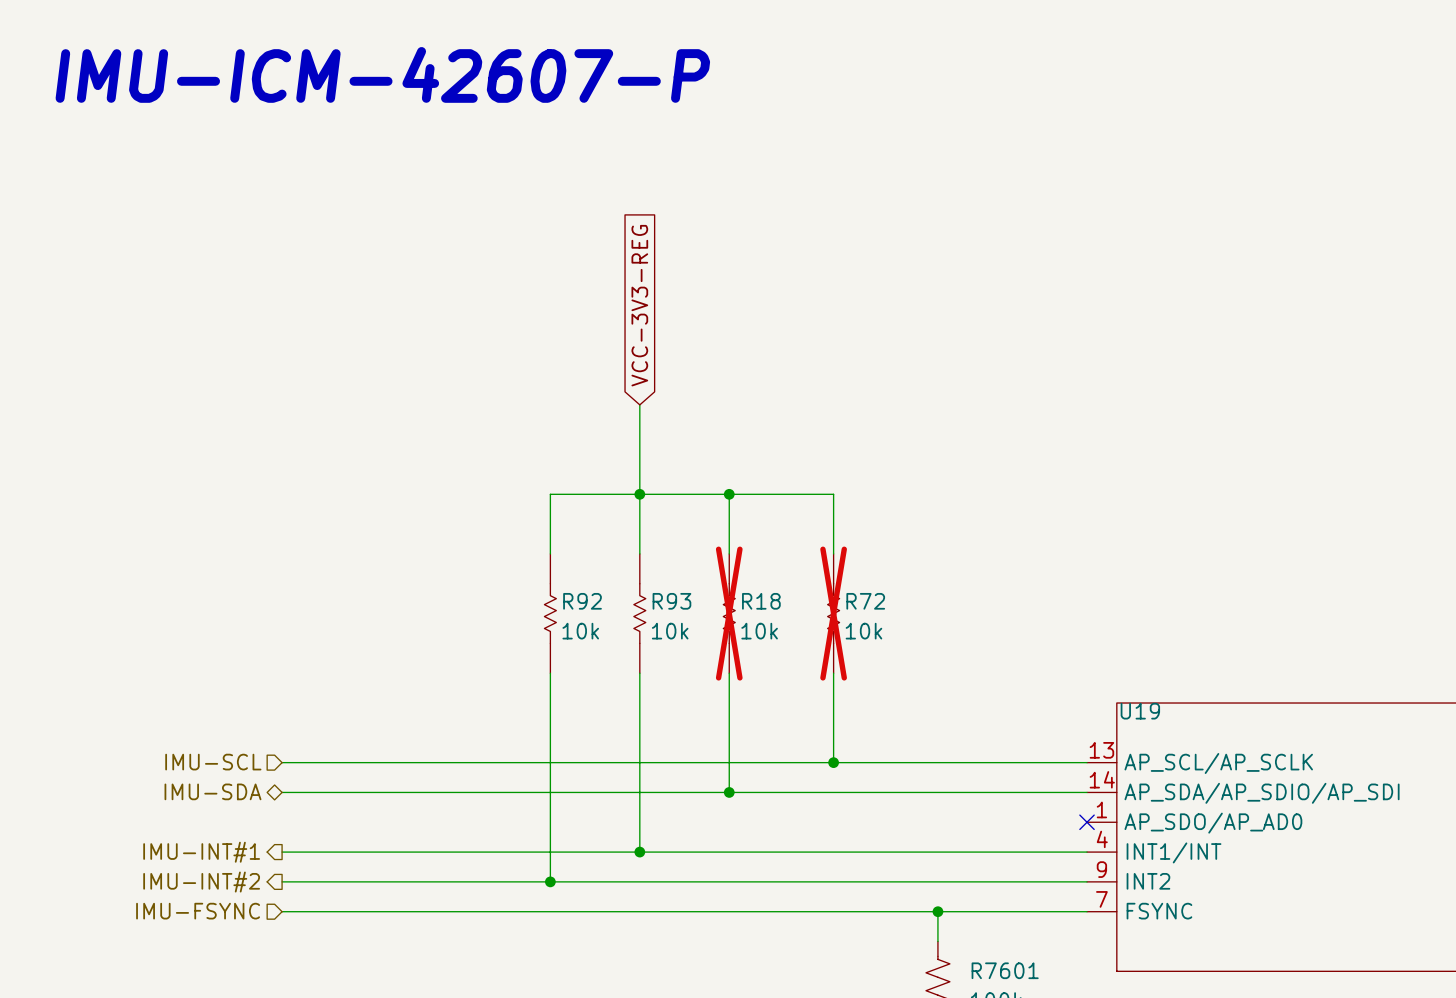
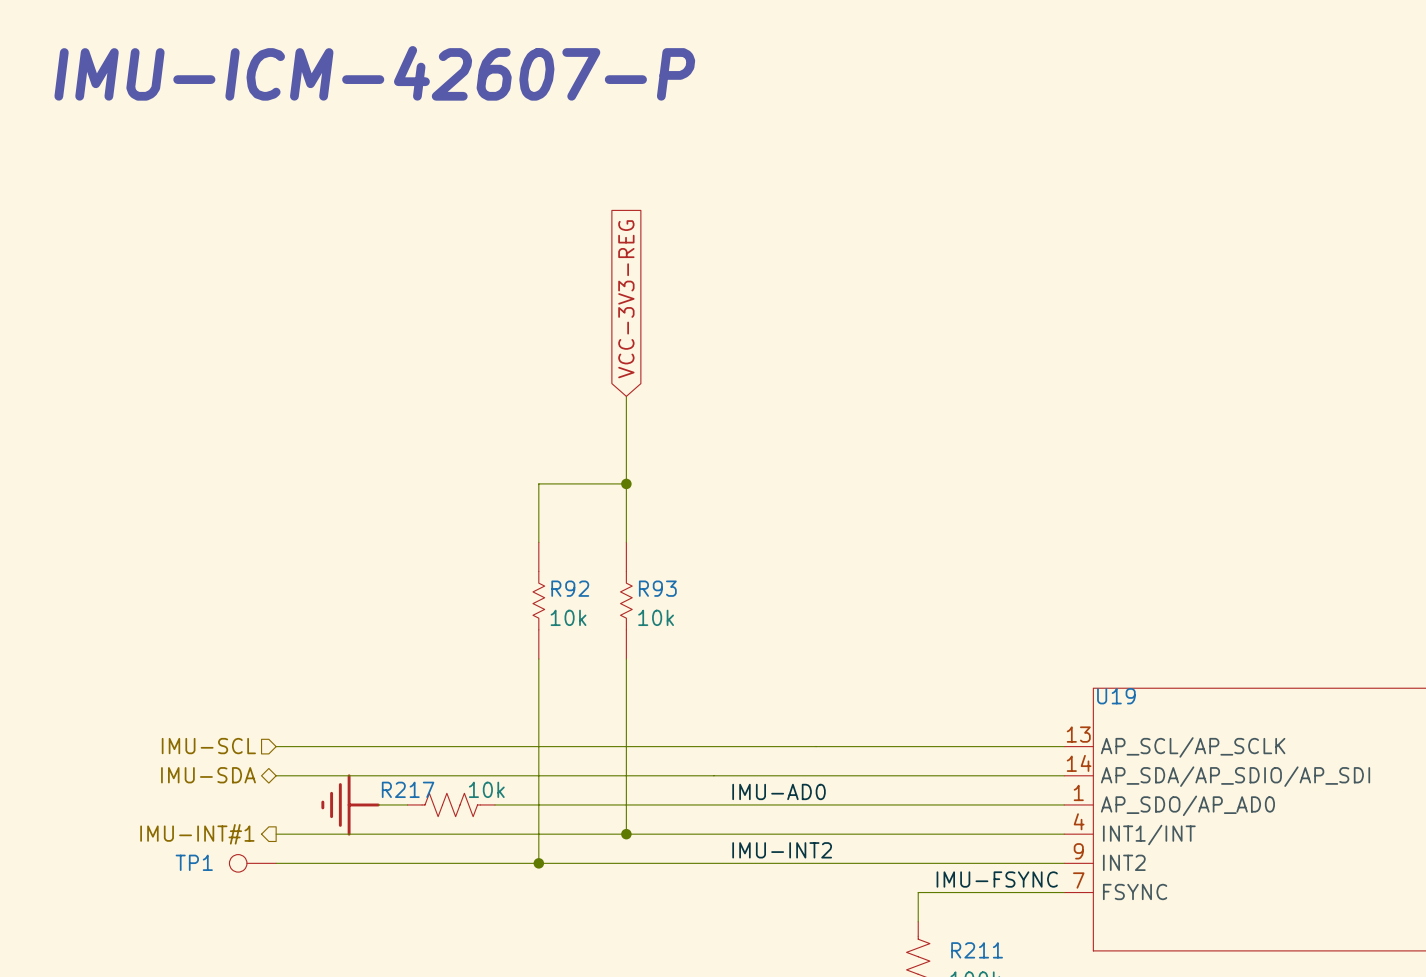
wire: (639, 494) (833, 494) (833, 553) -> none
wire: (729, 494) (729, 553) -> none
junction: (729, 494) -> none
R18: 10k (729, 613) -> none
R72: 10k (833, 613) -> none
wire: (729, 673) (729, 792) -> none
wire: (833, 673) (833, 762) -> none
junction: (833, 762) -> none
junction: (729, 792) -> none
label: none -> IMU-AD0 (779, 791)
power symbol: none -> (350, 804)
wire: none -> (378, 804) (407, 804)
R217: none -> 10k (451, 804)
wire: none -> (495, 804) (1064, 804)
no-connect mark: (1087, 822) -> none
label: none -> IMU-INT2 (782, 850)
TP1: none -> (252, 863)
hierarchical label: IMU-INT#2 (201, 882) -> none
label: none -> IMU-FSYNC (997, 879)
hierarchical label: IMU-FSYNC (198, 911) -> none
wire: (282, 911) (937, 911) -> none
junction: (937, 911) -> none
R7601 name: R7601 (1005, 970) -> R211 (977, 950)

